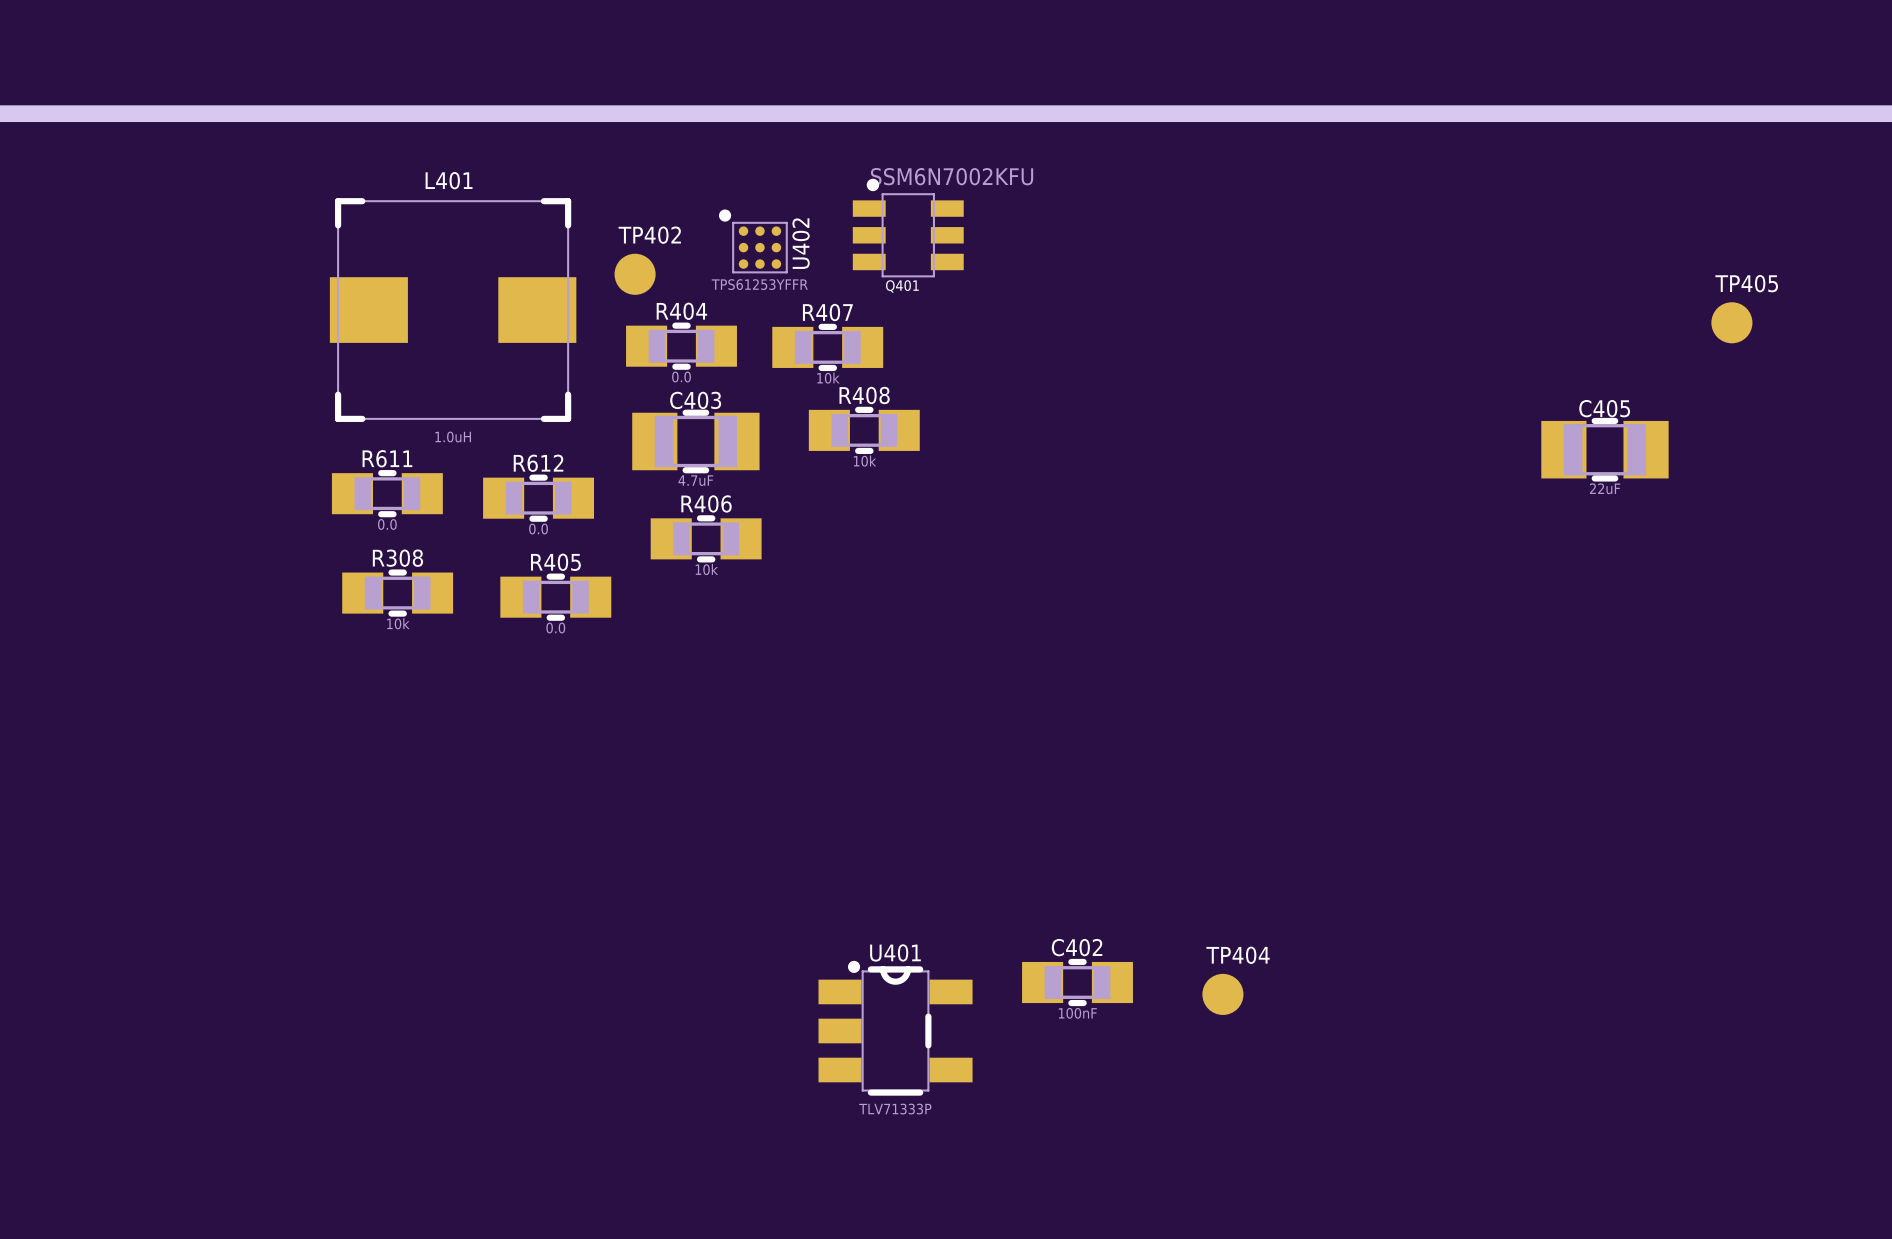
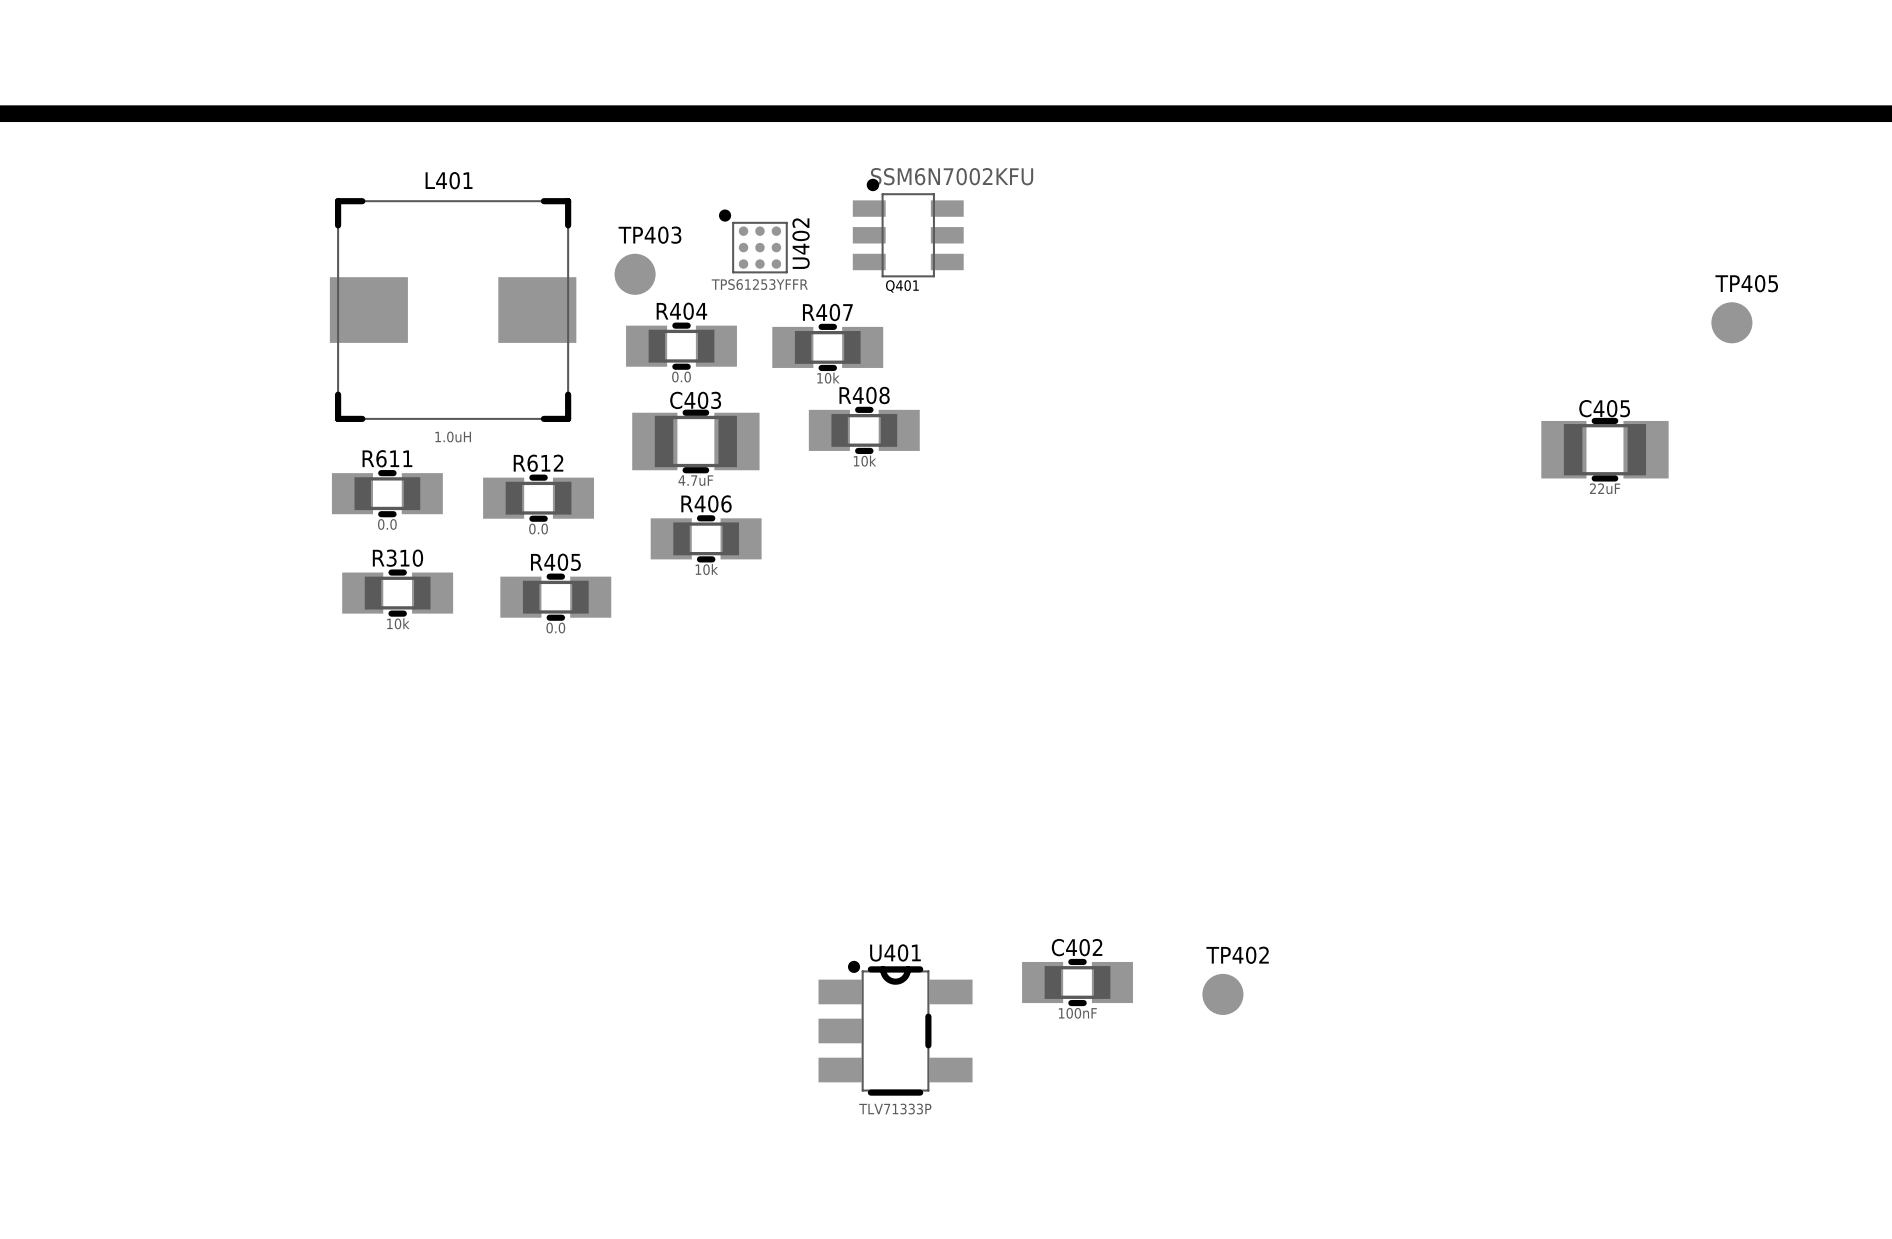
TP402 name: TP402 (649, 235) -> TP403 (649, 235)
R308 name: R308 (397, 558) -> R310 (397, 558)
TP404 name: TP404 (1238, 955) -> TP402 (1237, 955)

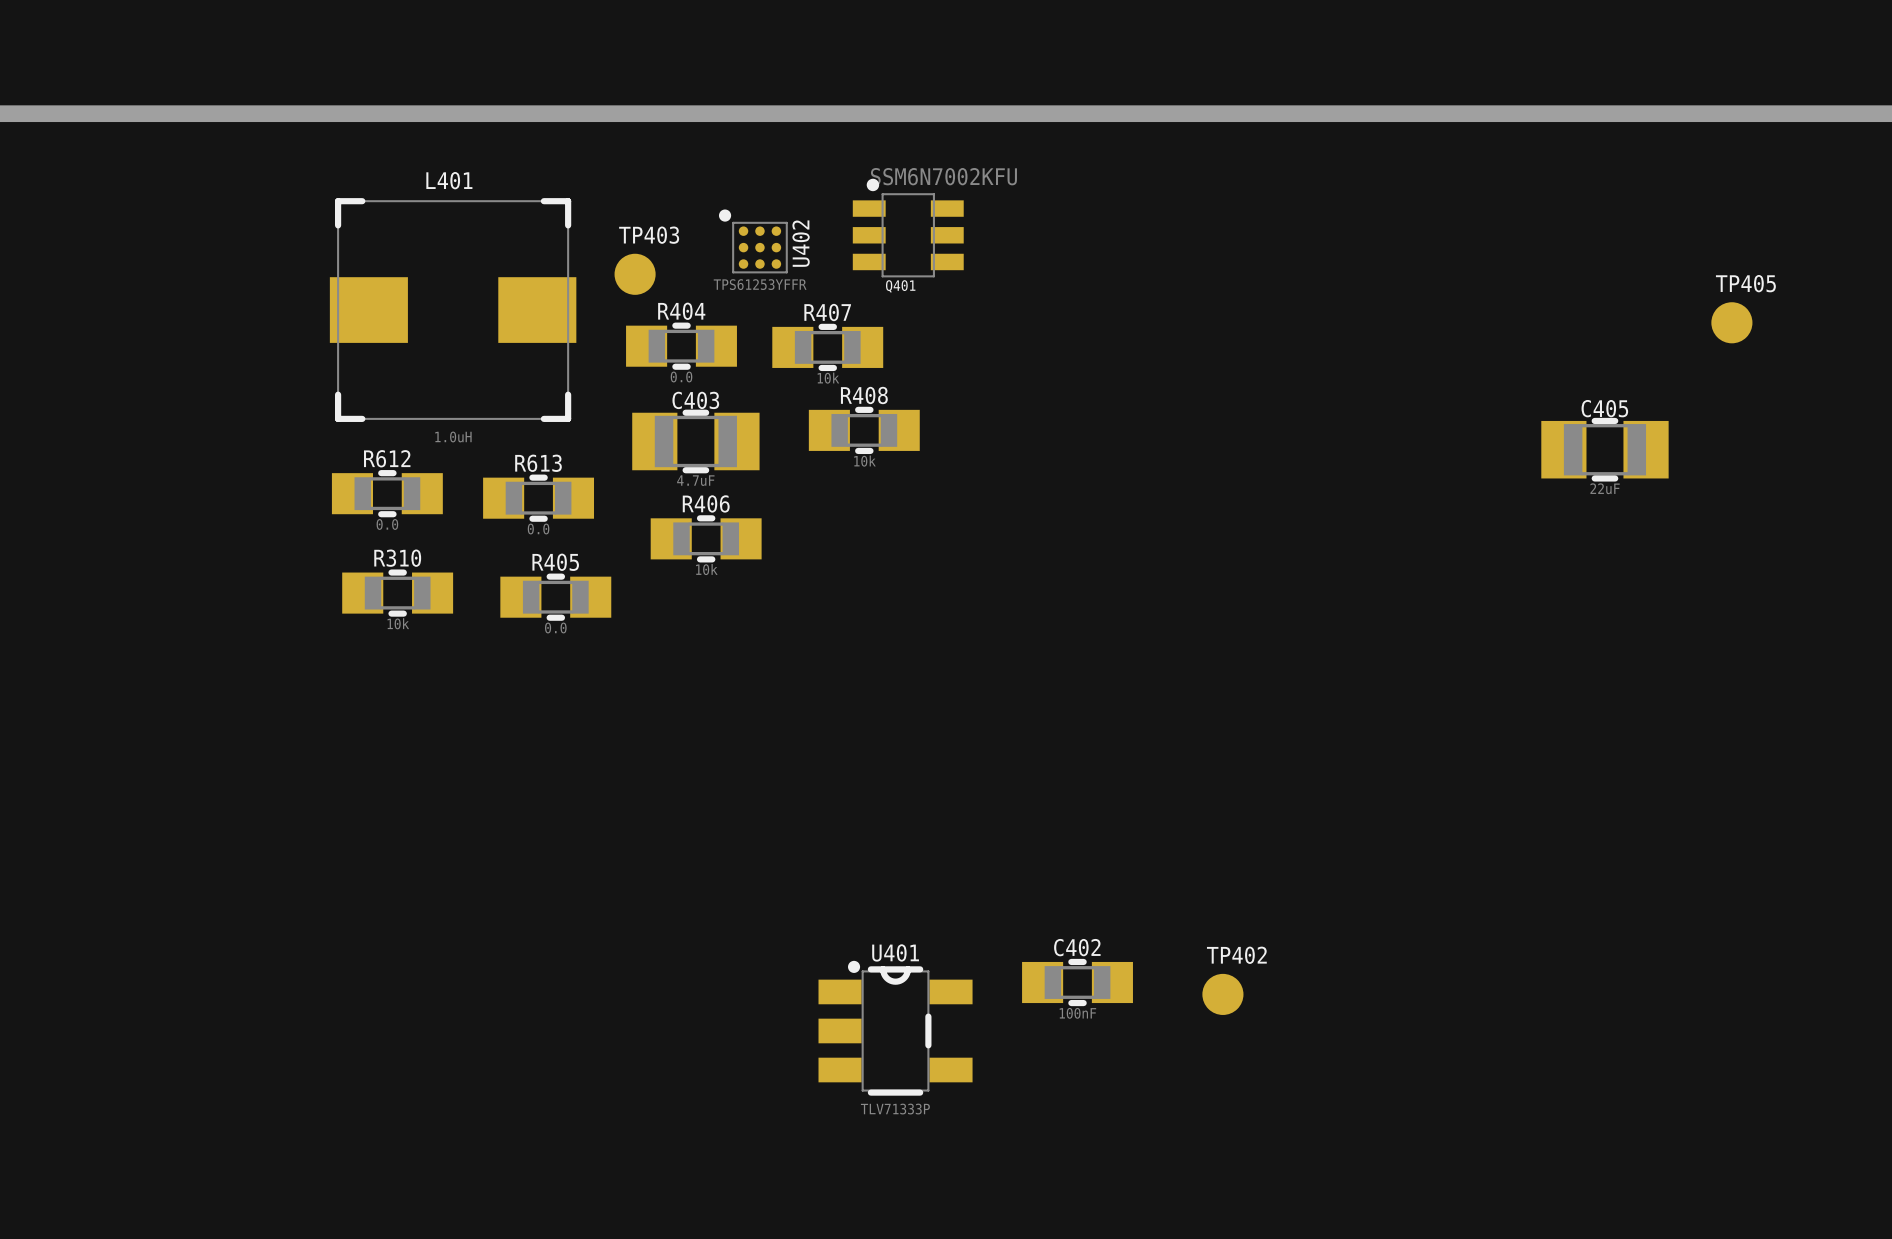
R611 name: R611 (387, 458) -> R612 (387, 458)
R612 name: R612 (538, 463) -> R613 (538, 463)

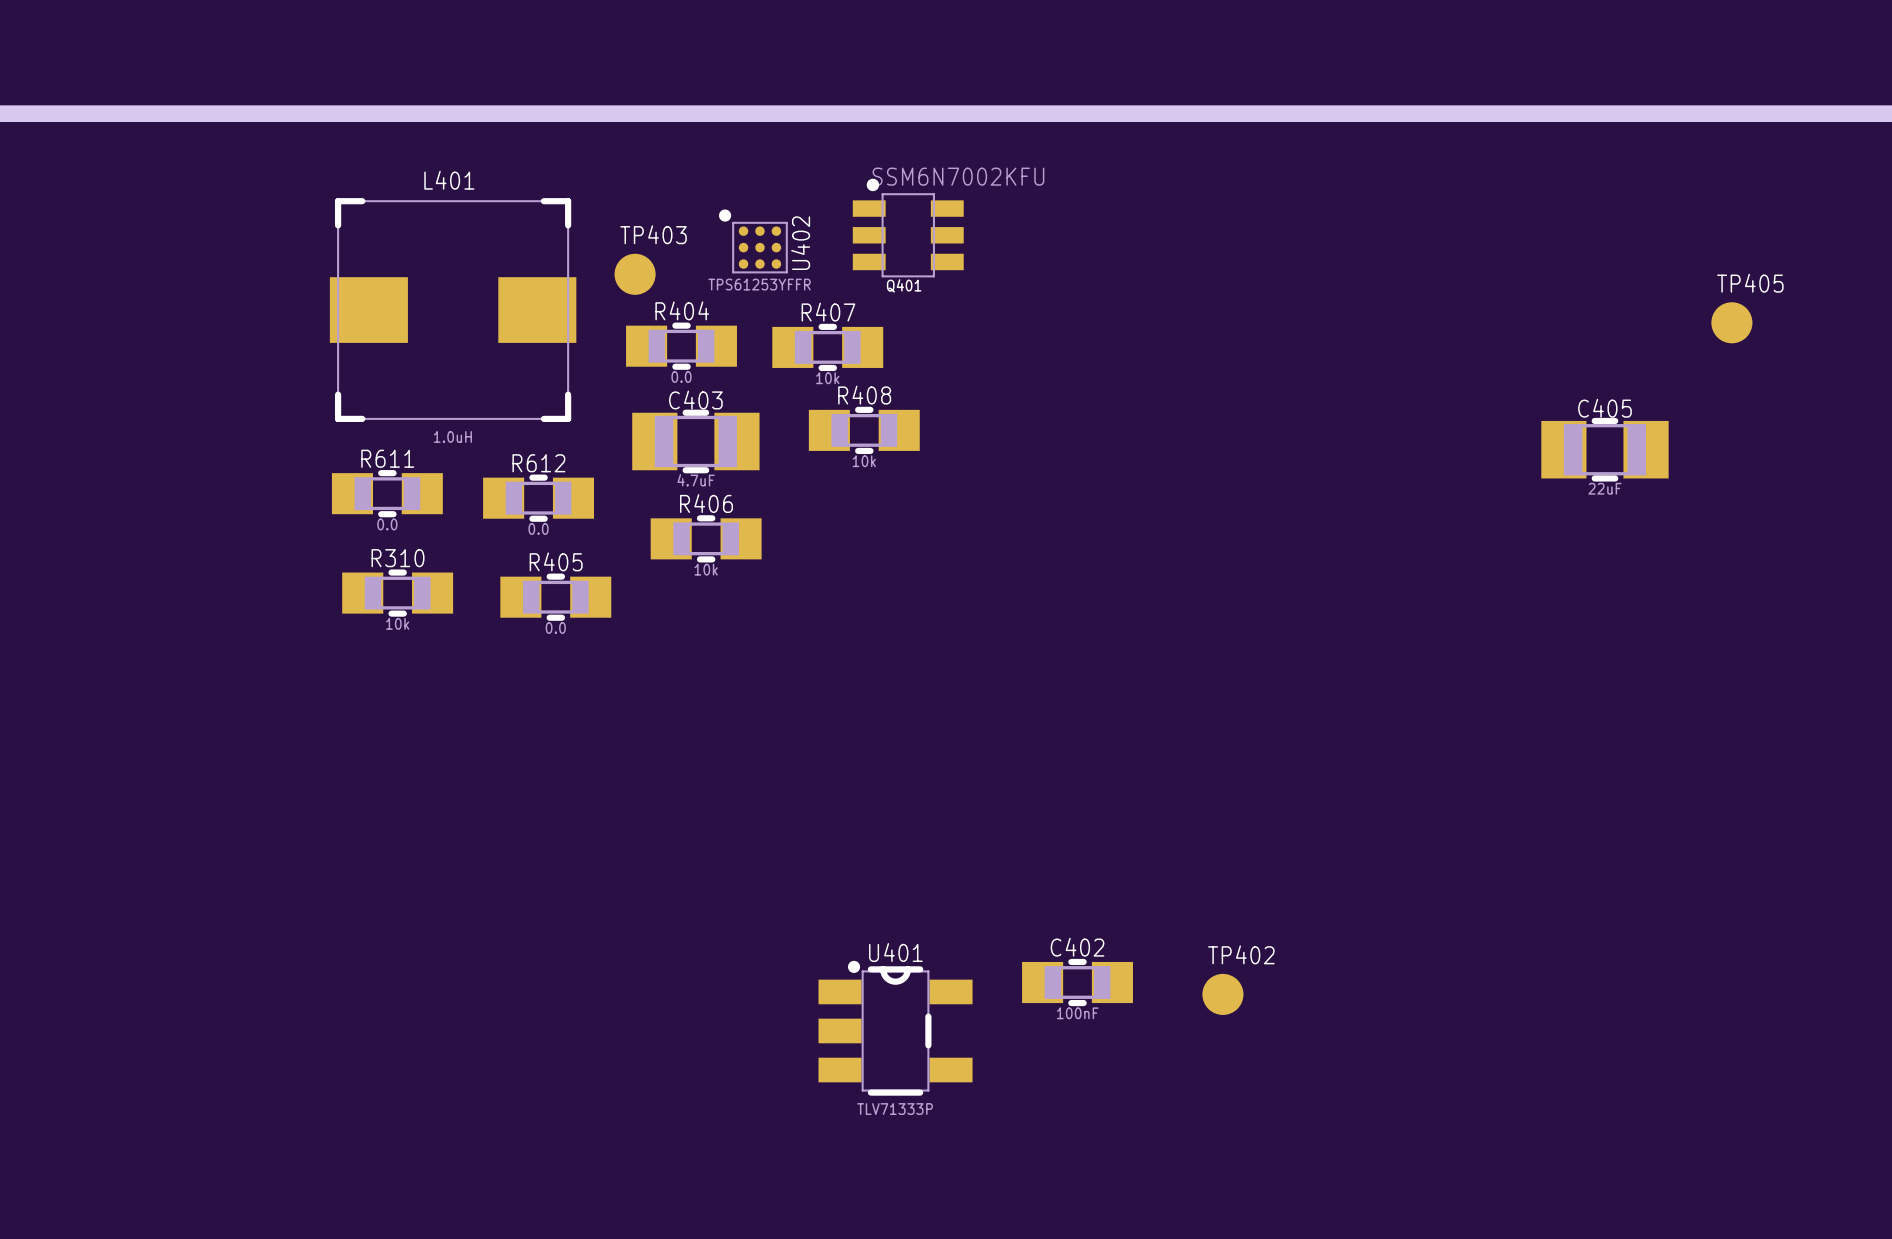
R612 name: R612 (387, 458) -> R611 (387, 458)
R613 name: R613 (538, 463) -> R612 (538, 463)

